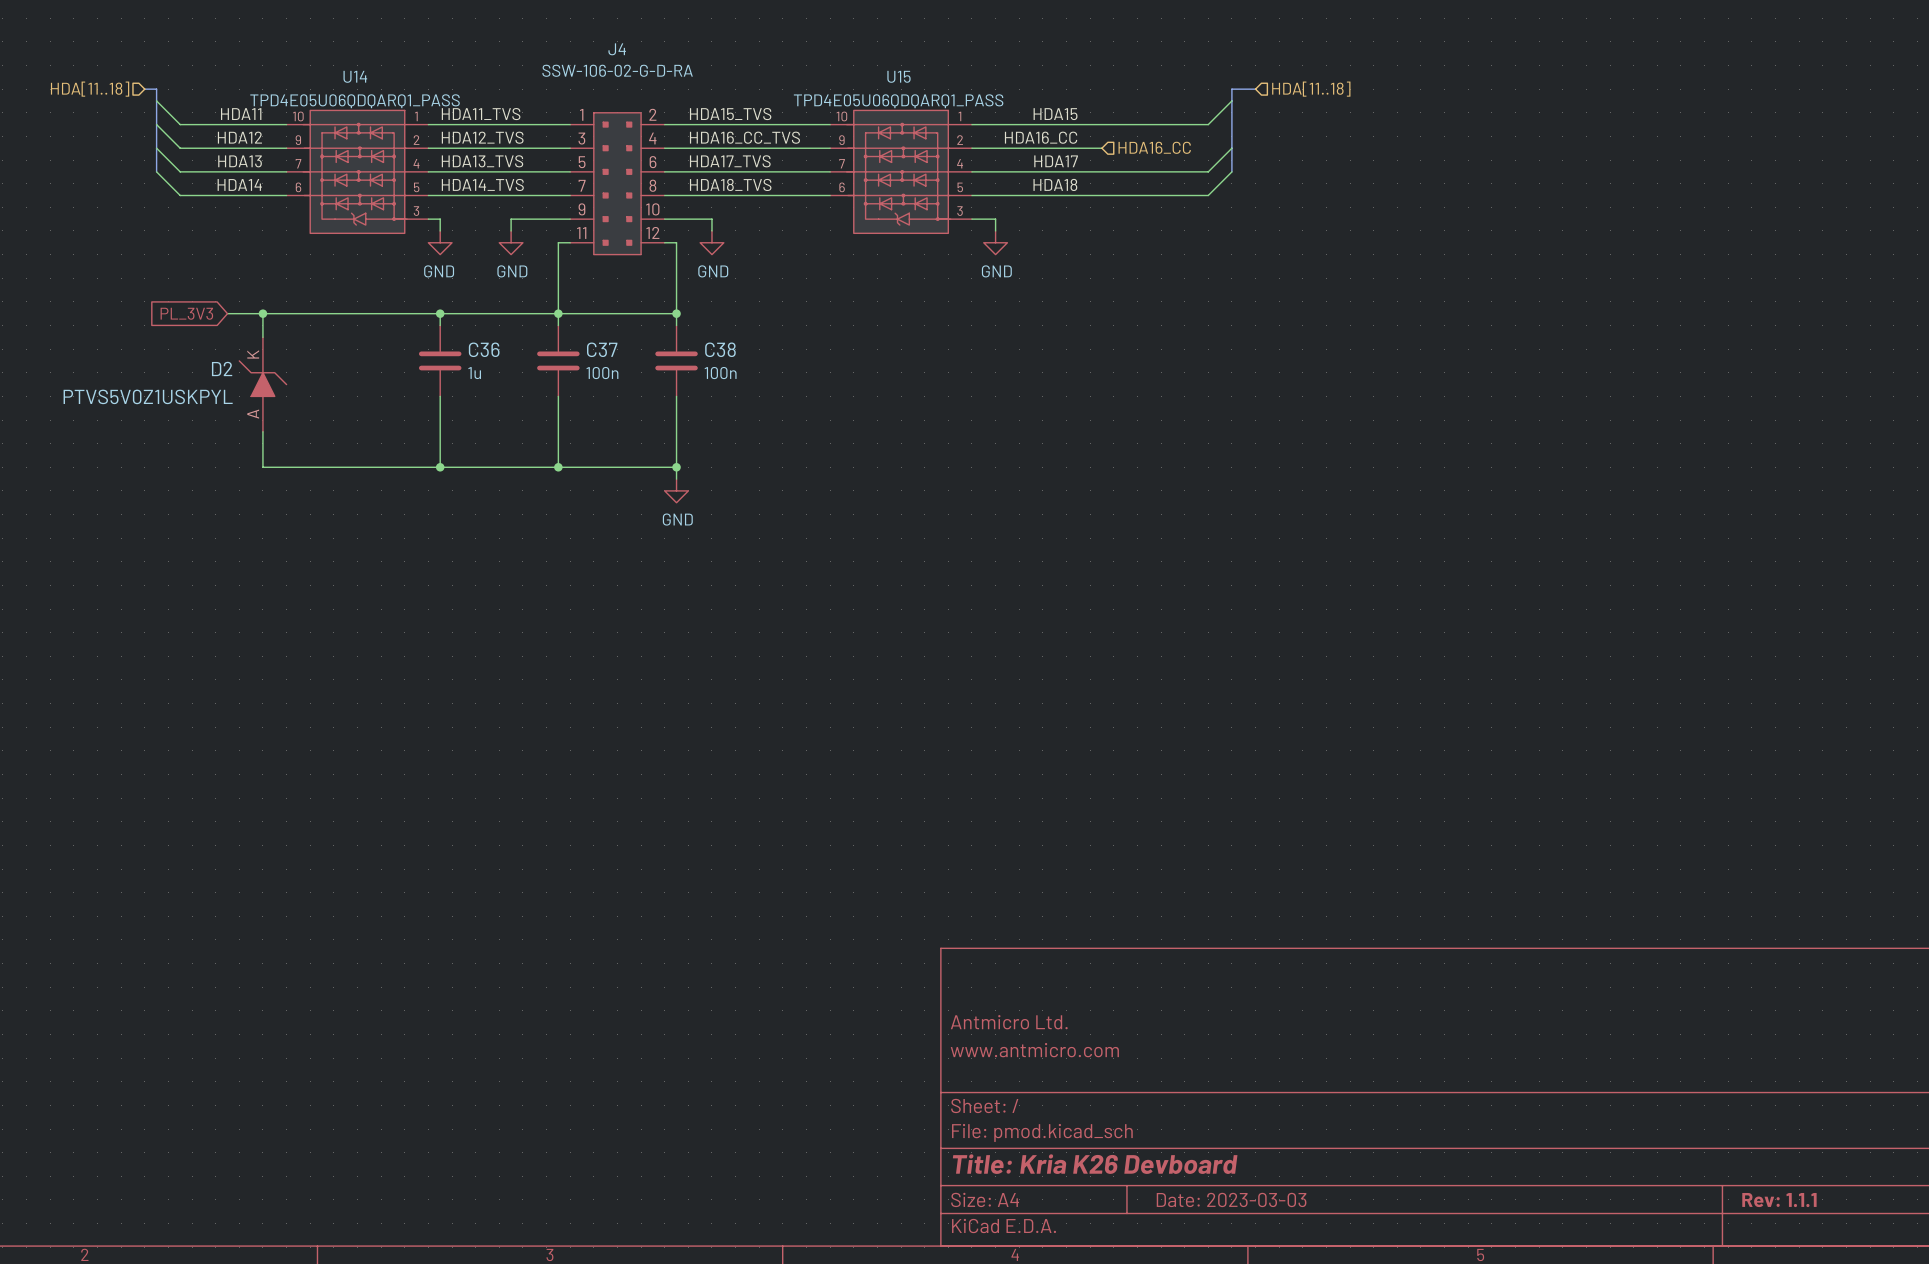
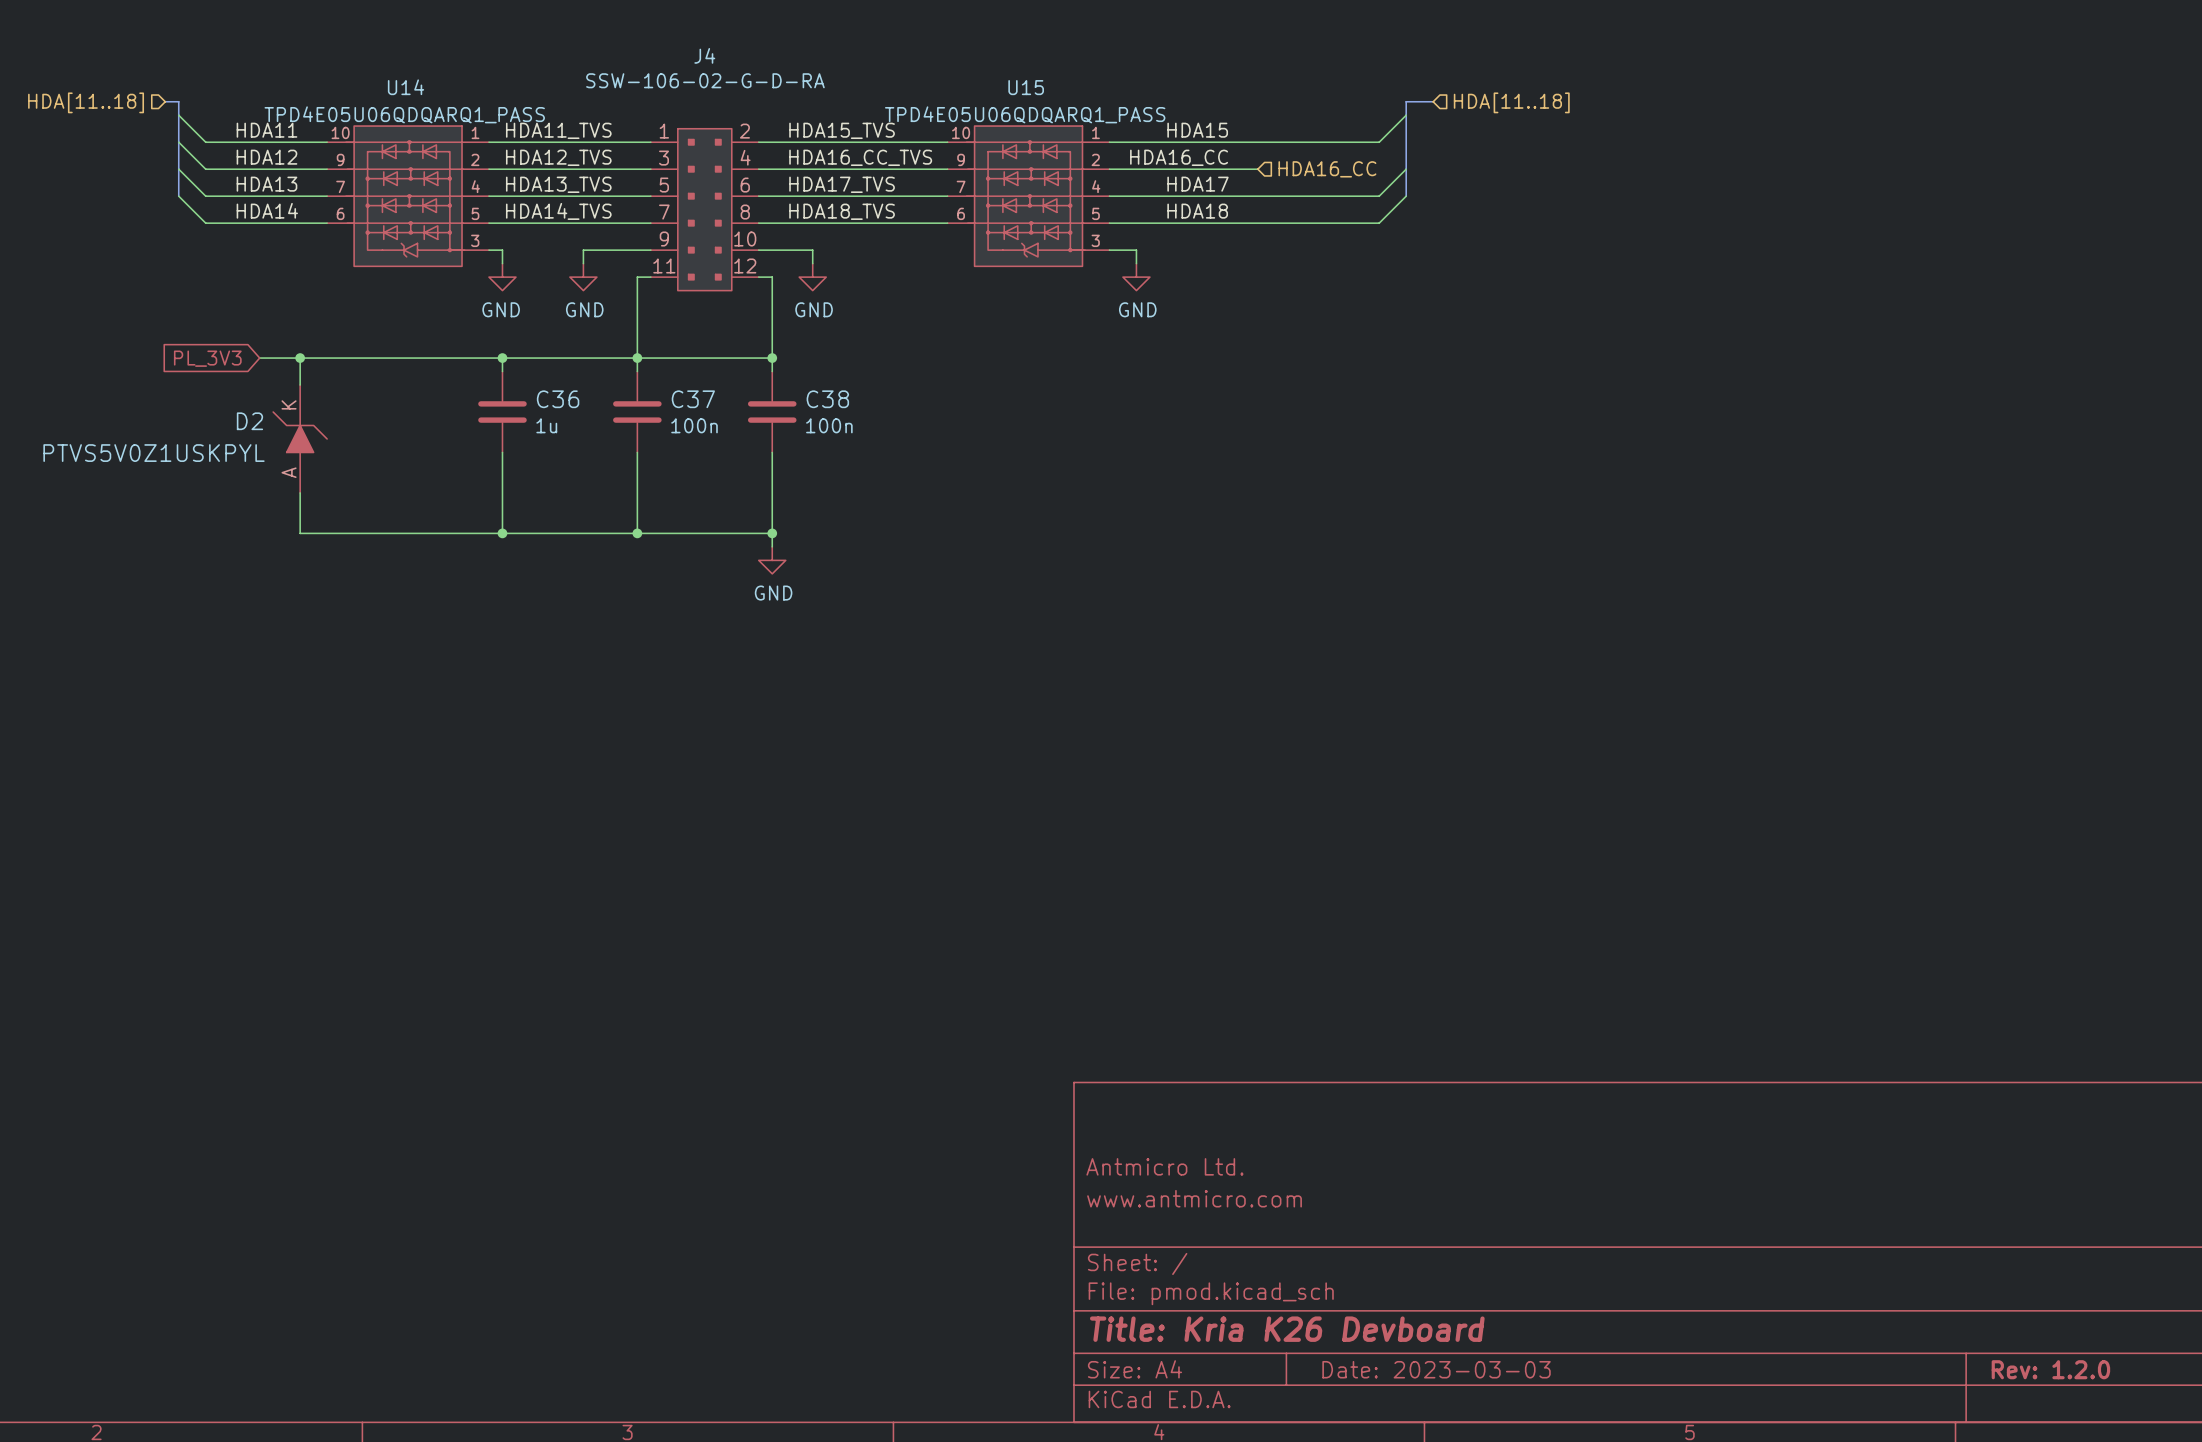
title block: Rev: 1.1.1 (1779, 1200) -> Rev: 1.2.0 (2050, 1369)

